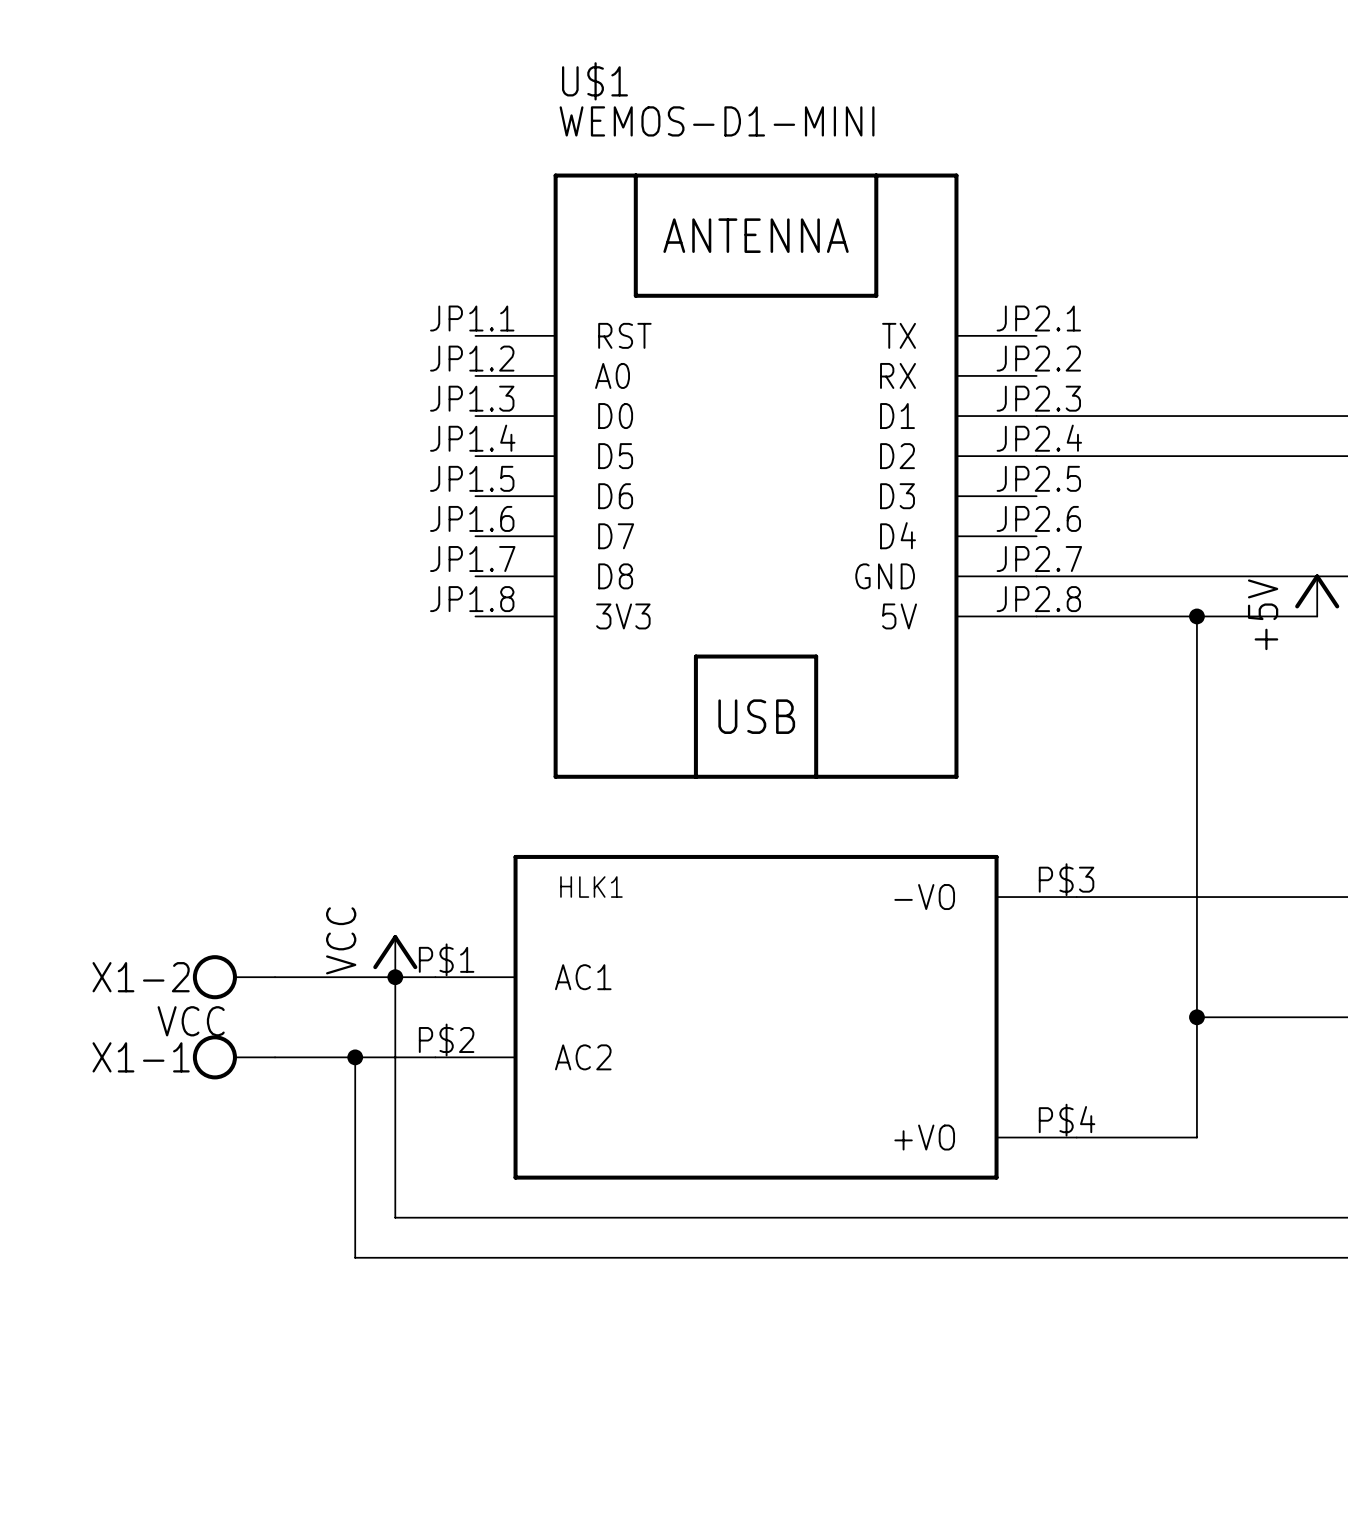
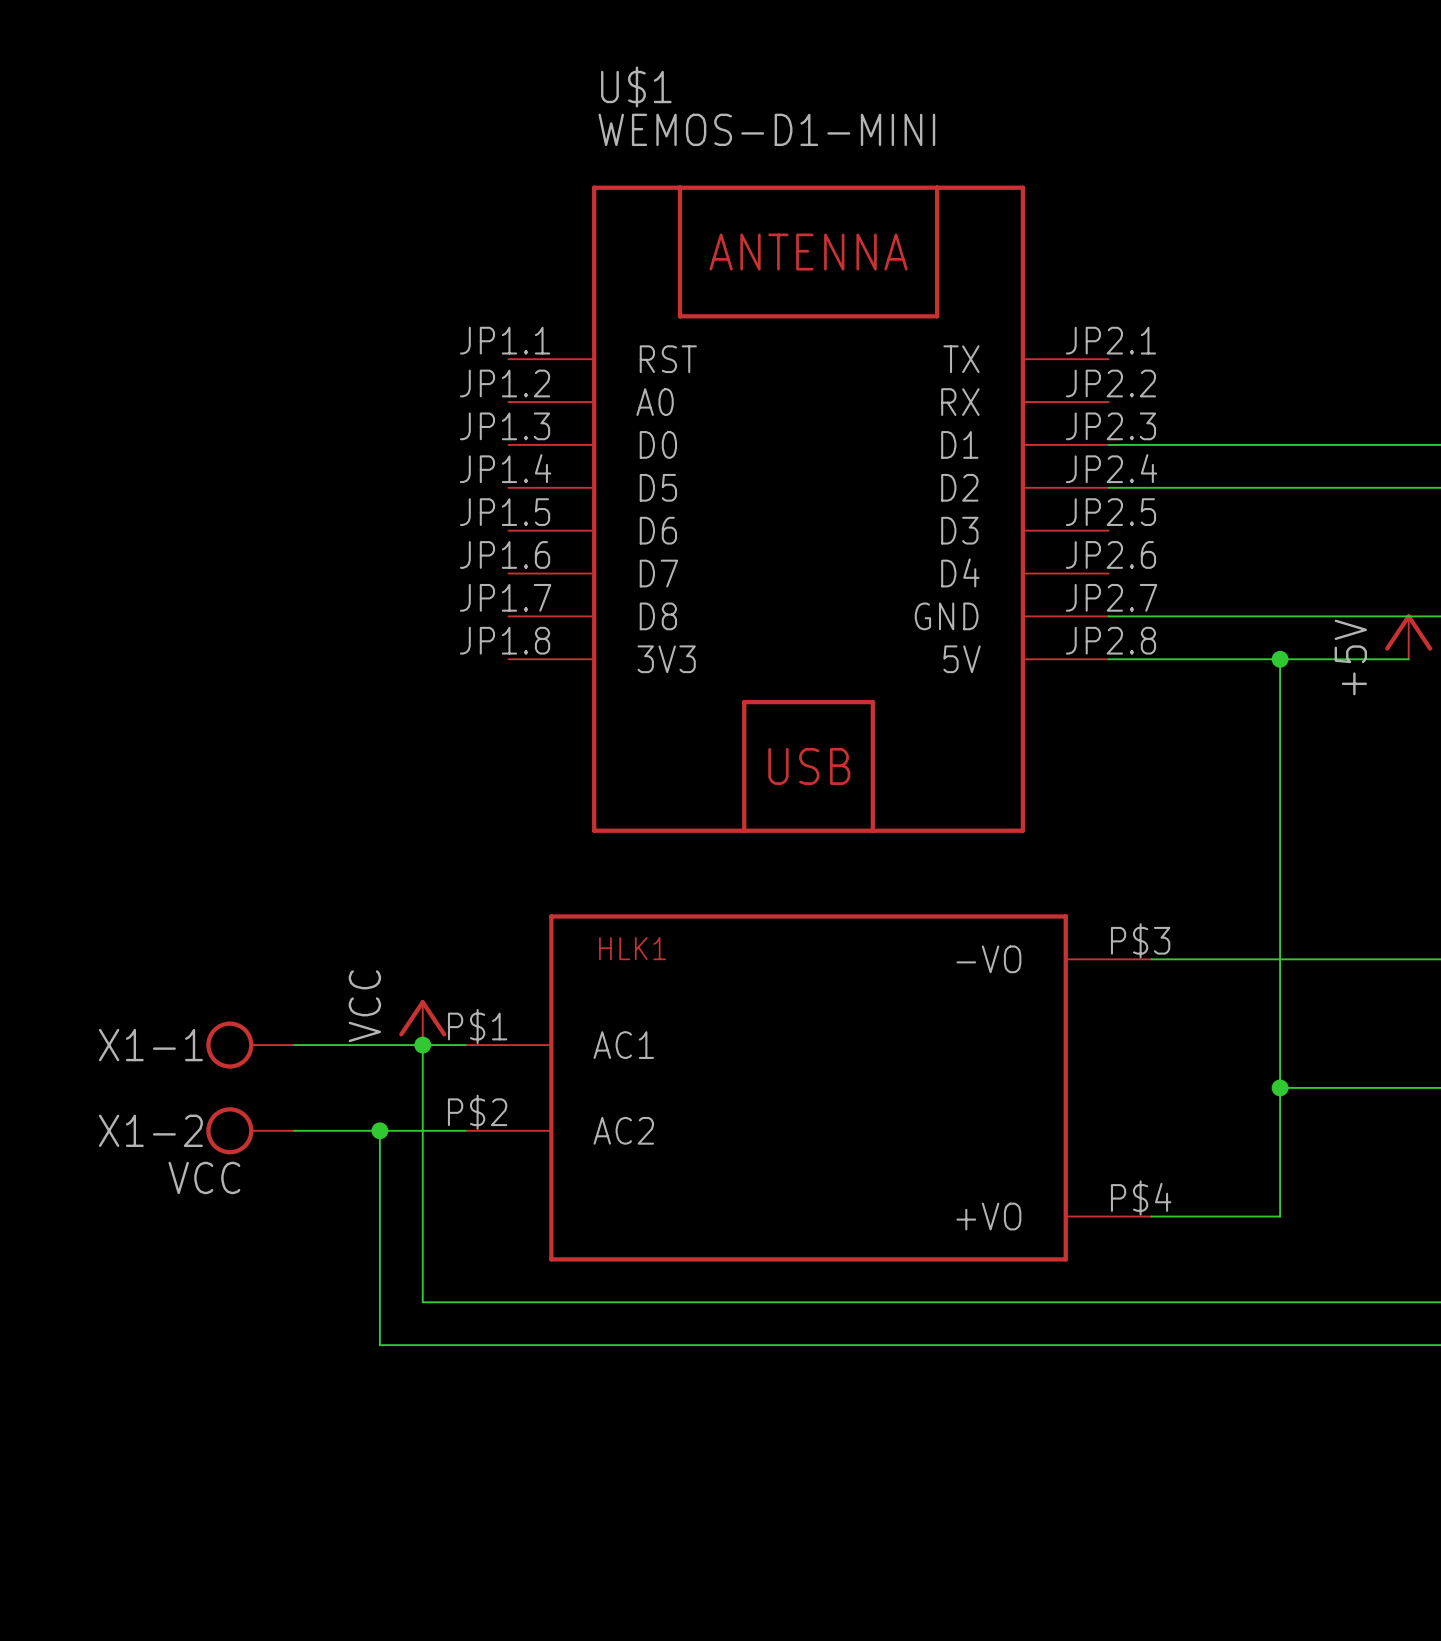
X1-2 name: X1-2 (141, 977) -> X1-1 (150, 1045)
X1-2 value: VCC (191, 1021) -> none
X1-1 name: X1-1 (141, 1057) -> X1-2 (150, 1130)
X1-1 value: none -> VCC (204, 1177)

